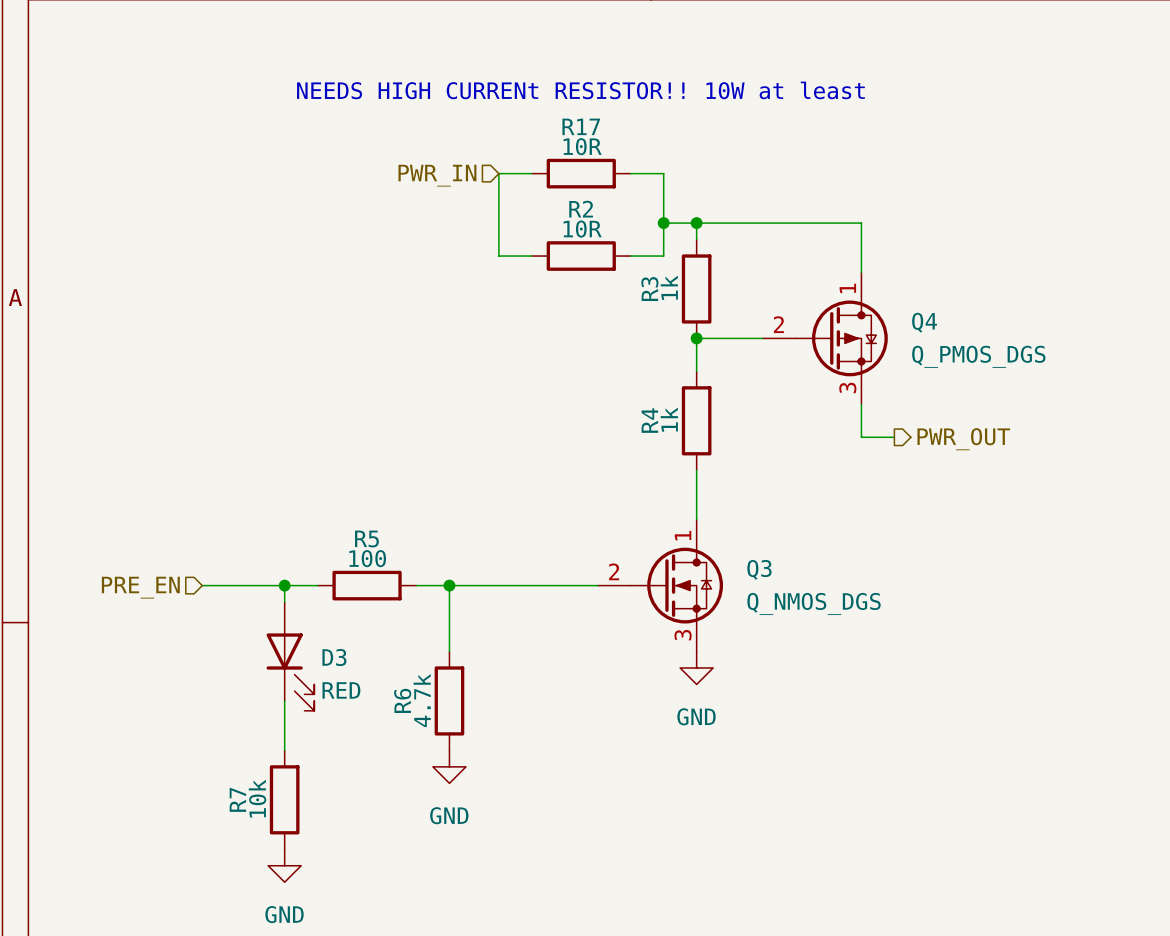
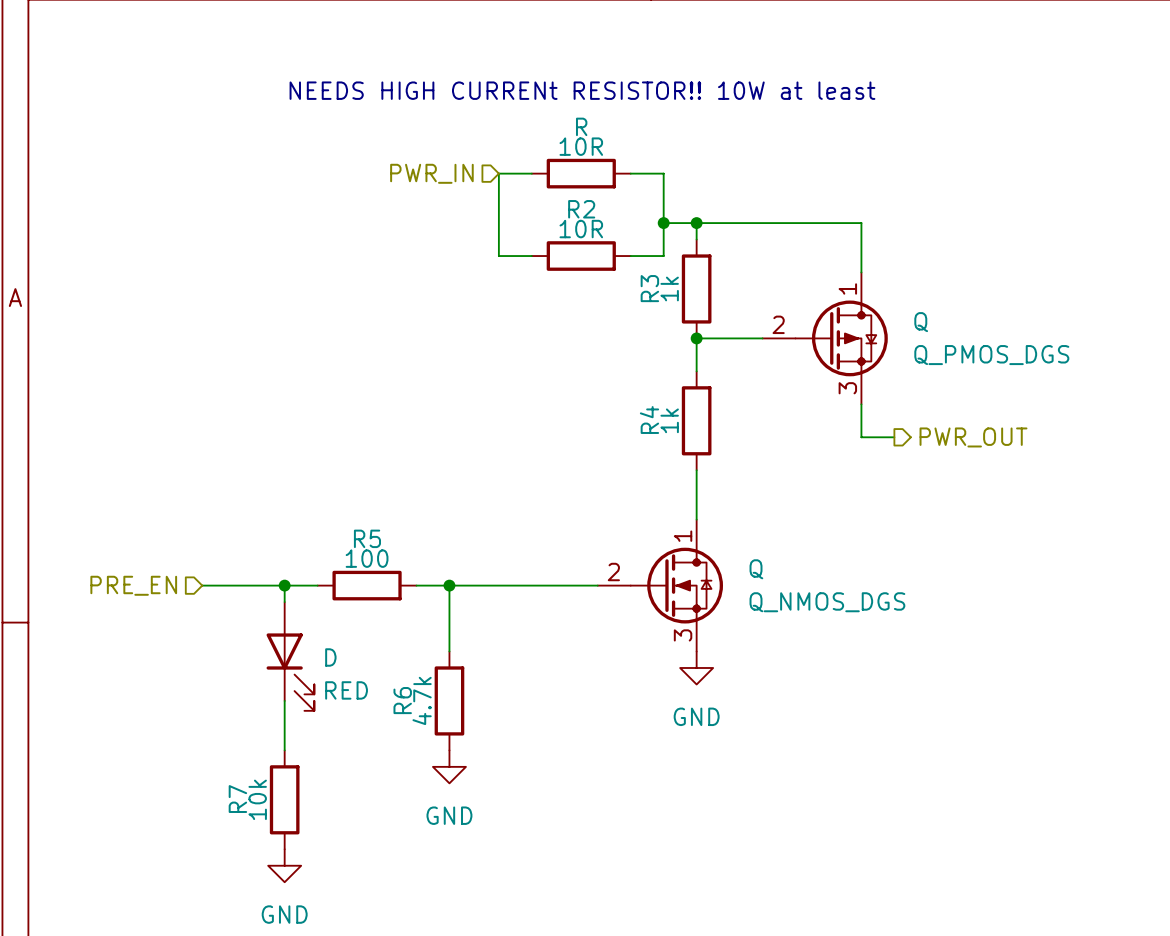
R17 name: R17 (581, 126) -> R (581, 126)
Q4 name: Q4 (924, 322) -> Q (921, 322)
Q3 name: Q3 (759, 569) -> Q (756, 569)
D3 name: D3 (334, 657) -> D (330, 657)

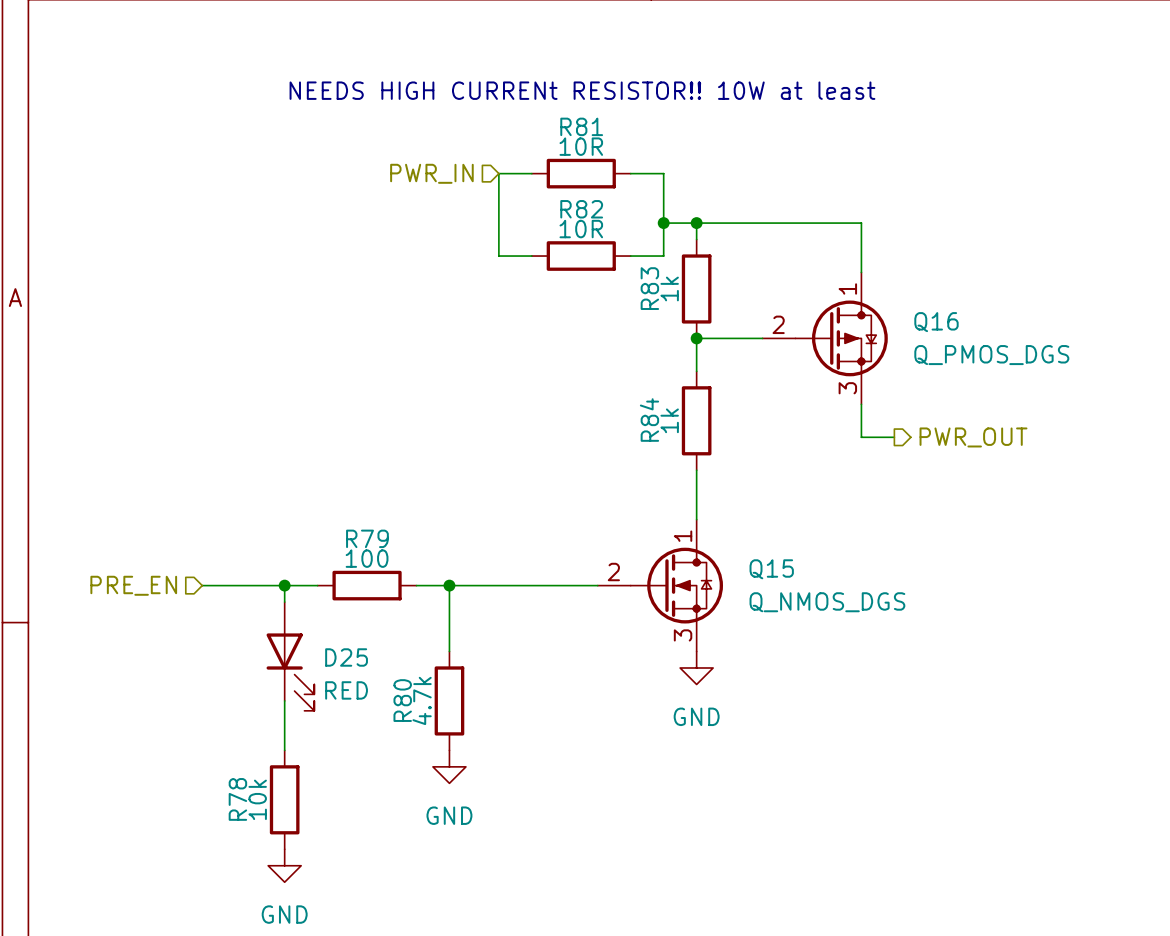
R name: R (581, 126) -> R81 (581, 126)
R2 name: R2 (581, 209) -> R82 (581, 209)
R3 name: R3 (649, 288) -> R83 (649, 288)
Q name: Q (921, 322) -> Q16 (936, 322)
R4 name: R4 (649, 420) -> R84 (649, 420)
R5 name: R5 (367, 538) -> R79 (367, 538)
Q name: Q (756, 569) -> Q15 (771, 569)
D name: D (330, 657) -> D25 (346, 657)
R6 name: R6 (402, 700) -> R80 (402, 700)
R7 name: R7 (237, 799) -> R78 (237, 799)

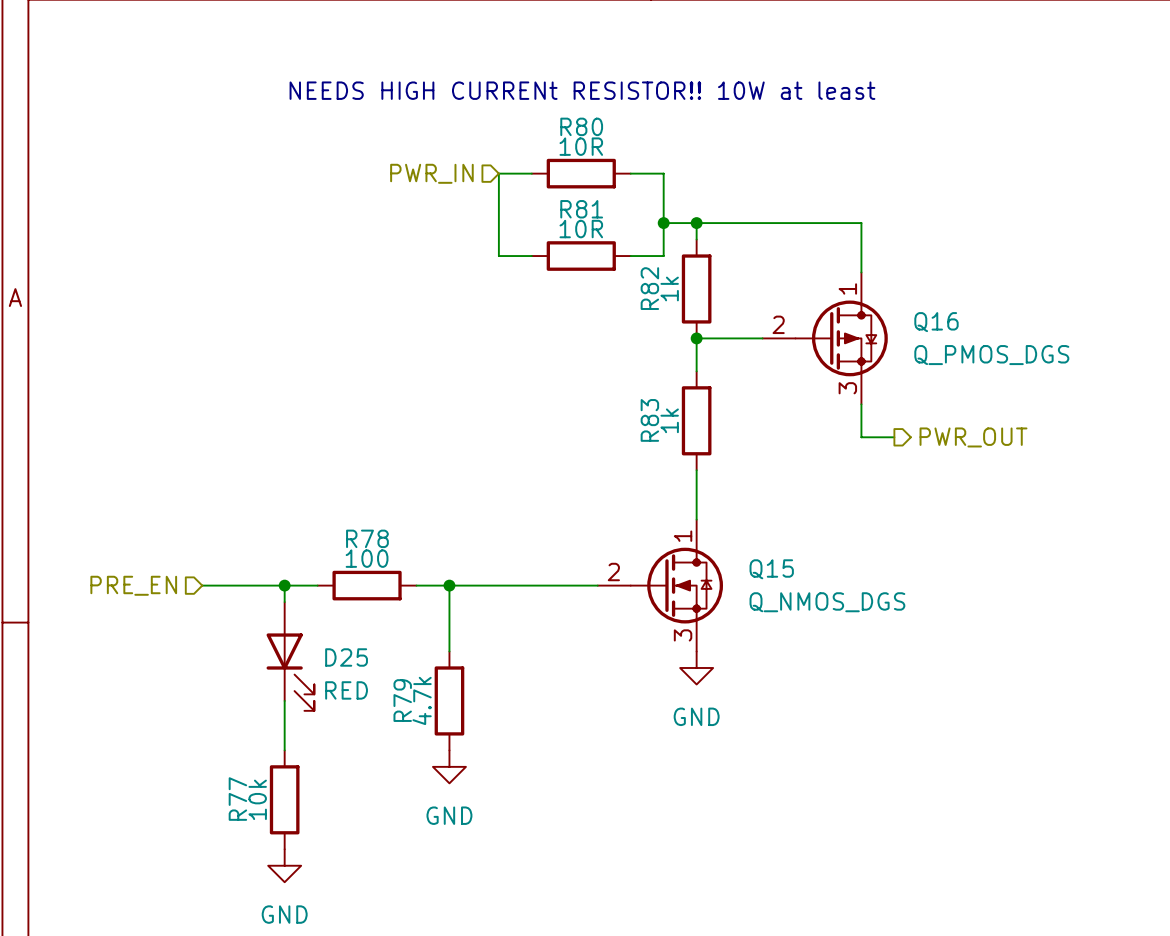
R81 name: R81 (581, 126) -> R80 (581, 126)
R82 name: R82 (581, 209) -> R81 (581, 209)
R83 name: R83 (649, 288) -> R82 (649, 288)
R84 name: R84 (649, 420) -> R83 (649, 420)
R79 name: R79 (367, 538) -> R78 (367, 538)
R80 name: R80 (402, 700) -> R79 (402, 700)
R78 name: R78 (237, 799) -> R77 (237, 799)

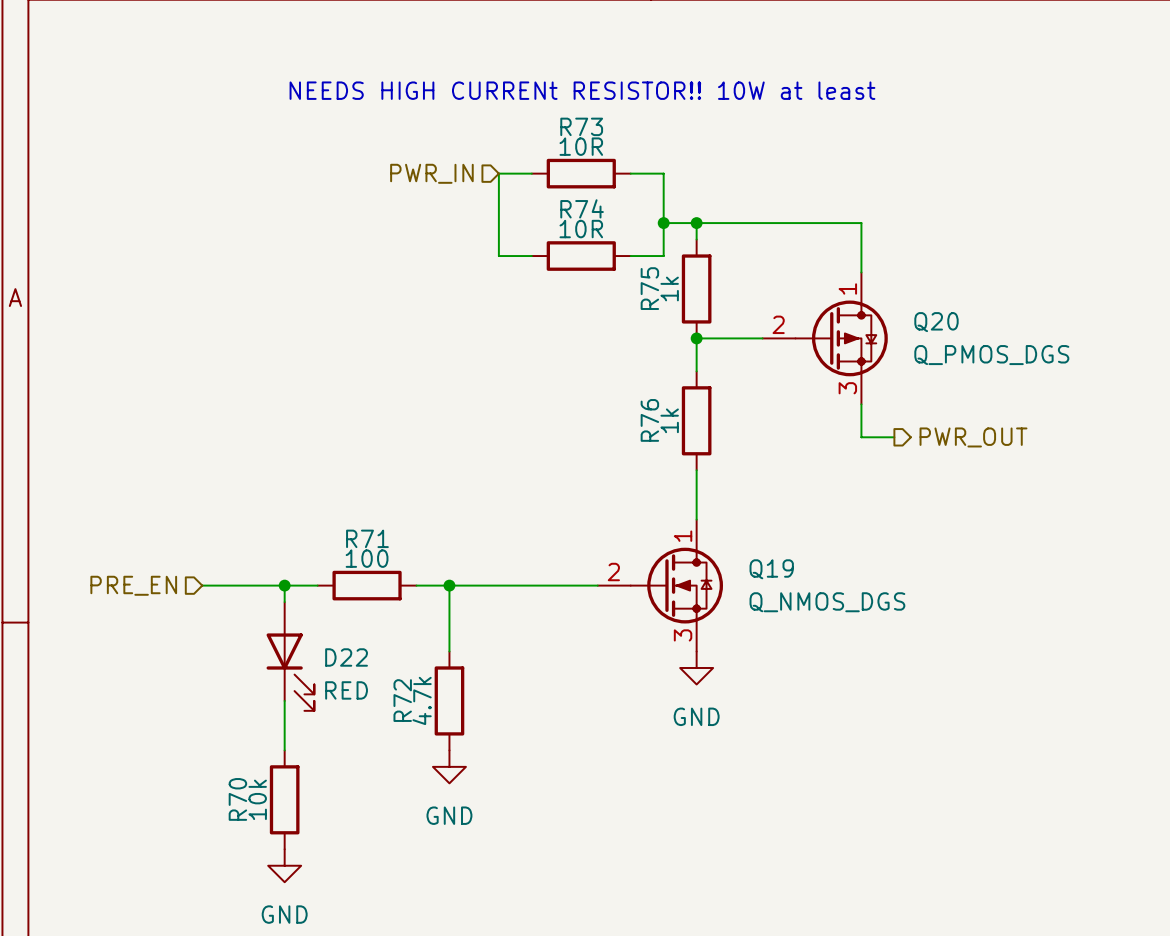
R80 name: R80 (581, 126) -> R73 (581, 126)
R81 name: R81 (581, 209) -> R74 (582, 208)
R82 name: R82 (649, 288) -> R75 (649, 288)
Q16 name: Q16 (936, 322) -> Q20 (936, 322)
R83 name: R83 (649, 420) -> R76 (649, 420)
R78 name: R78 (367, 538) -> R71 (367, 538)
Q15 name: Q15 (771, 569) -> Q19 (771, 569)
D25 name: D25 (346, 657) -> D22 (346, 657)
R79 name: R79 (402, 700) -> R72 (402, 700)
R77 name: R77 (237, 799) -> R70 (237, 799)

